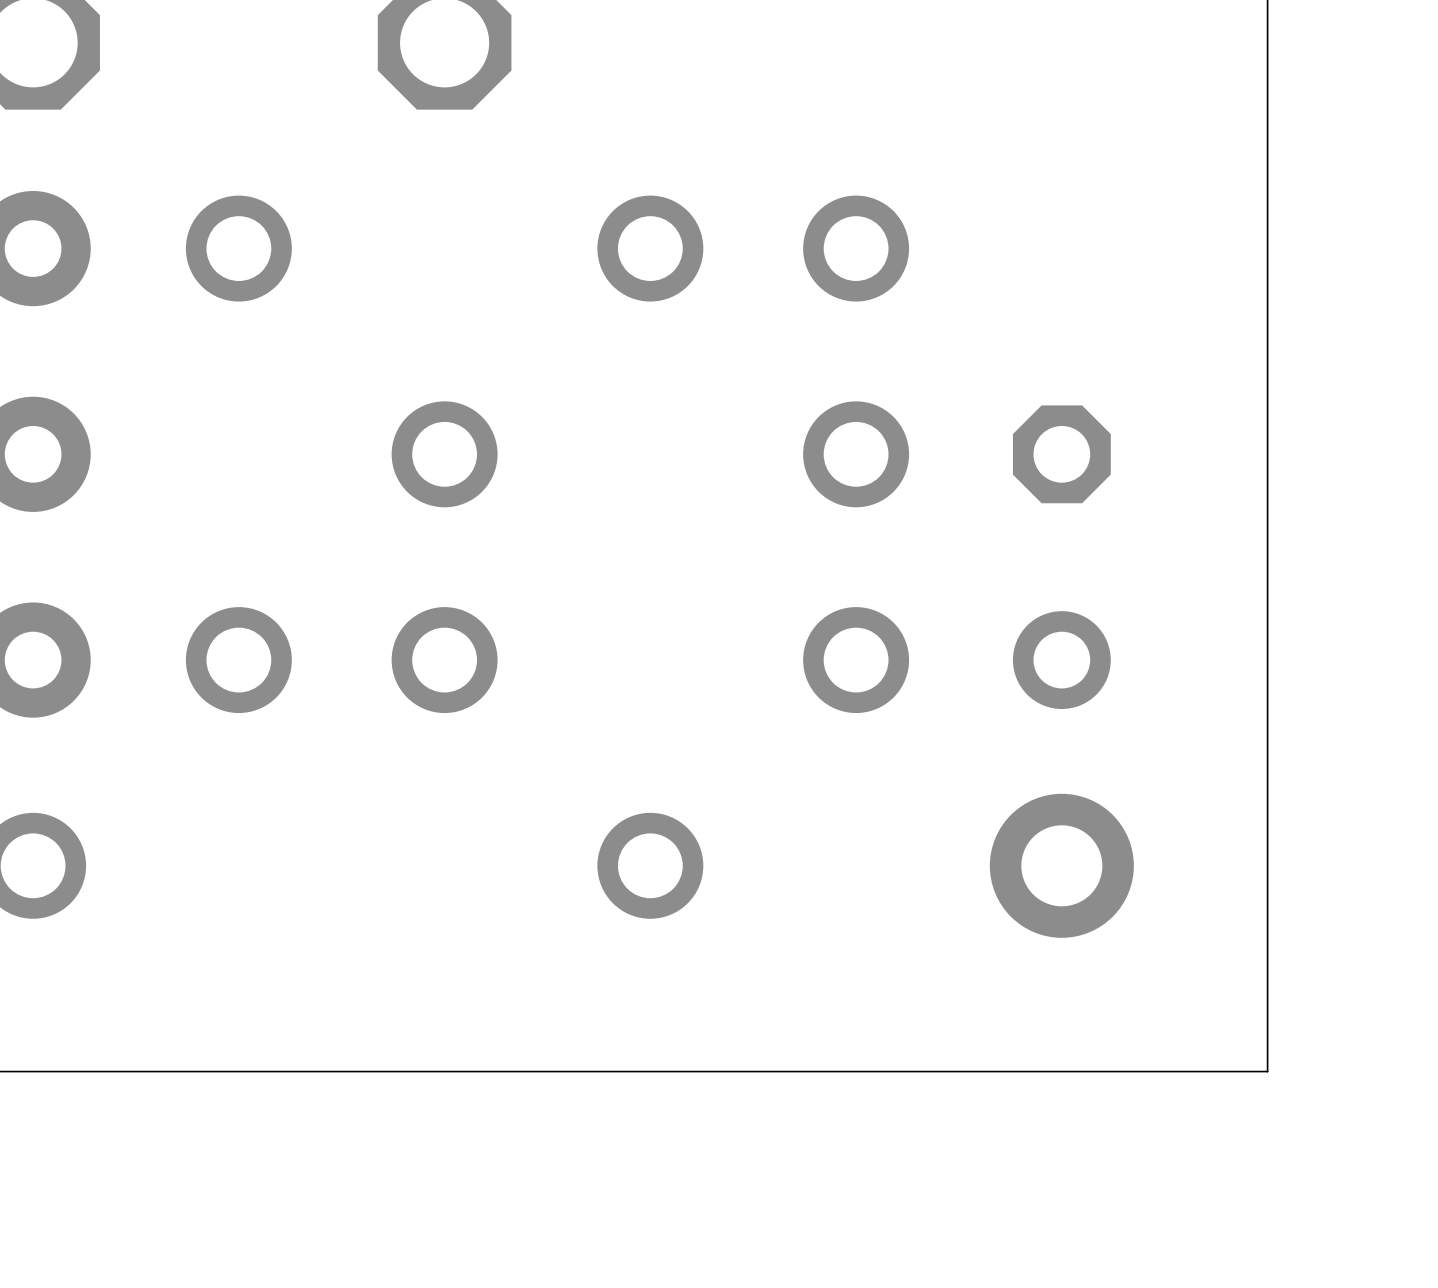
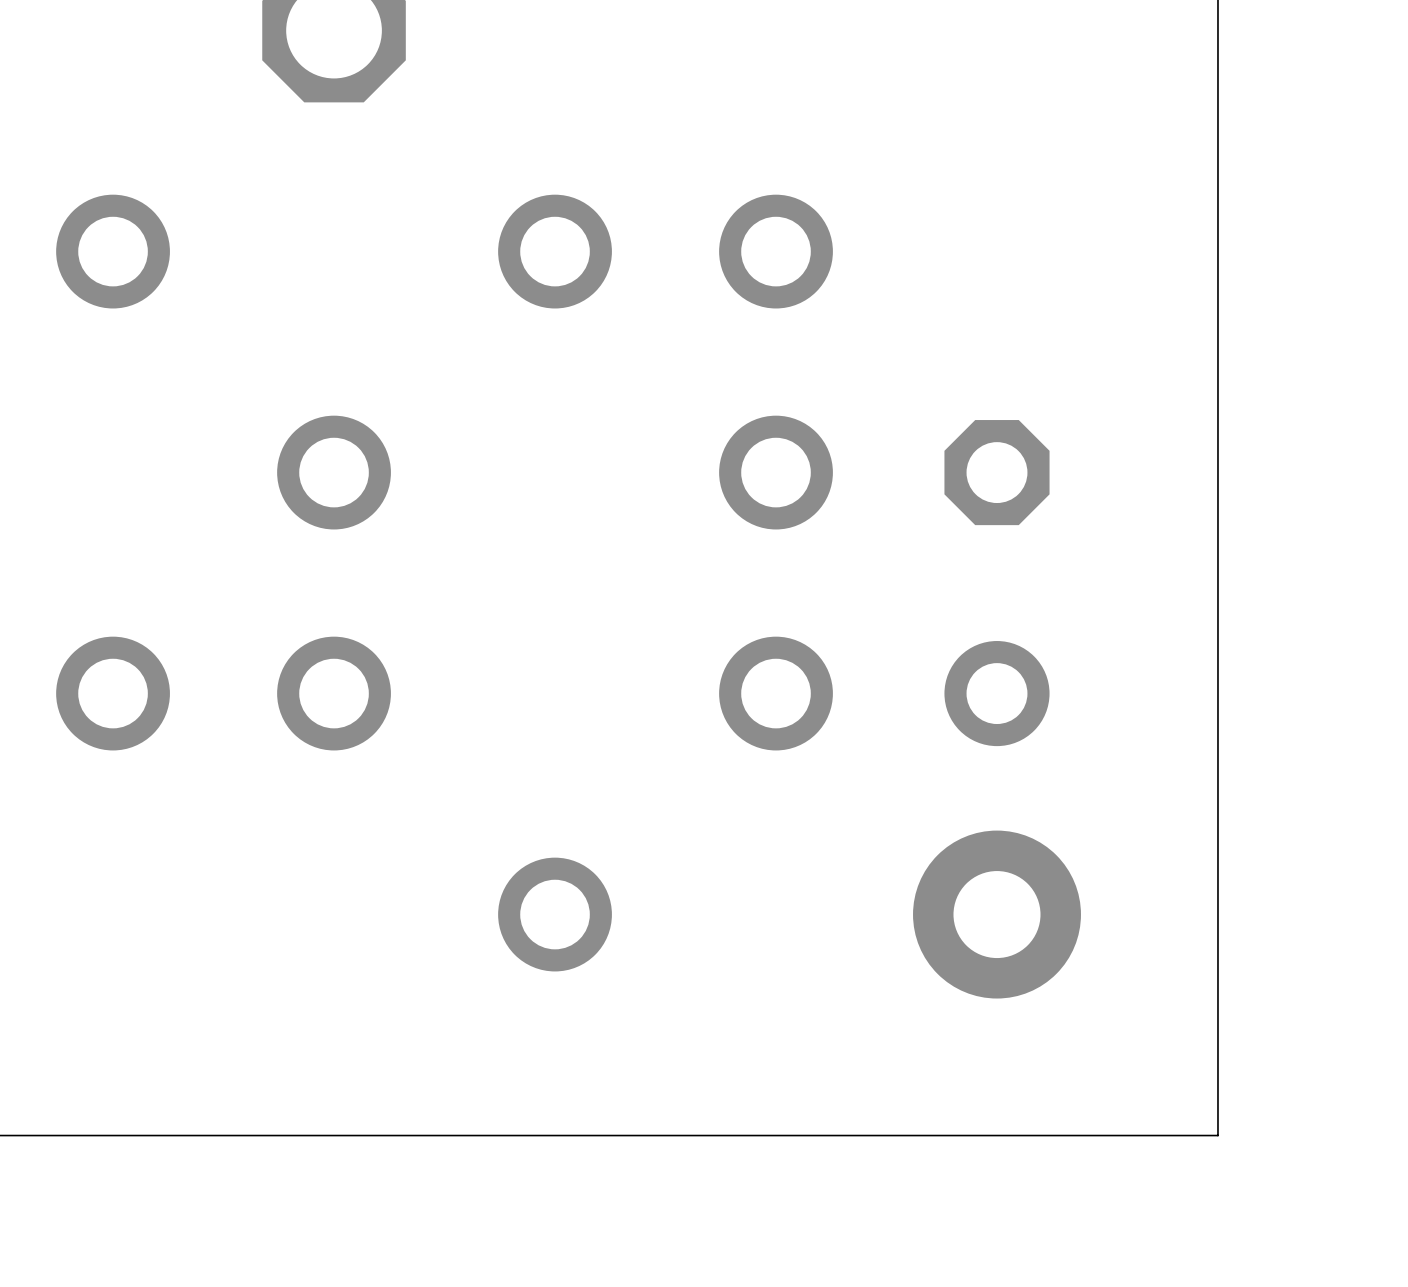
part footprint: [989, 793, 1134, 938] -> [913, 830, 1081, 999]

